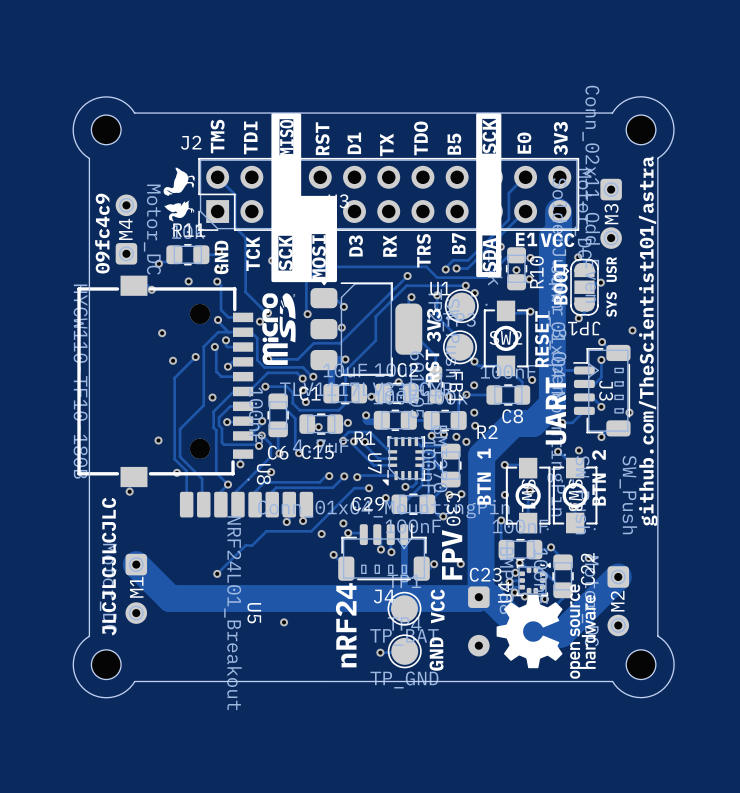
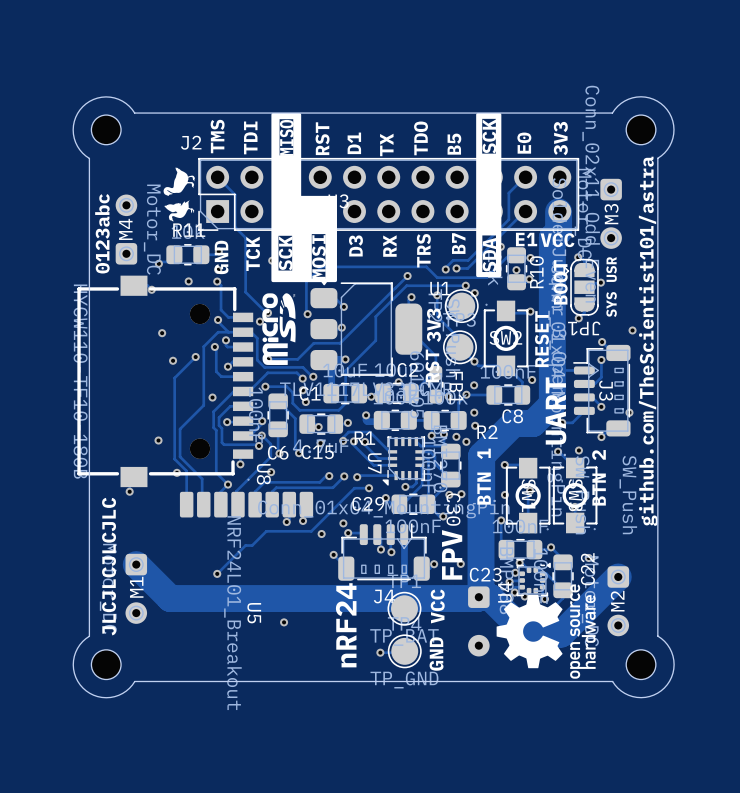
text: 09fc4c9 (102, 233) -> 0123abc (102, 233)

